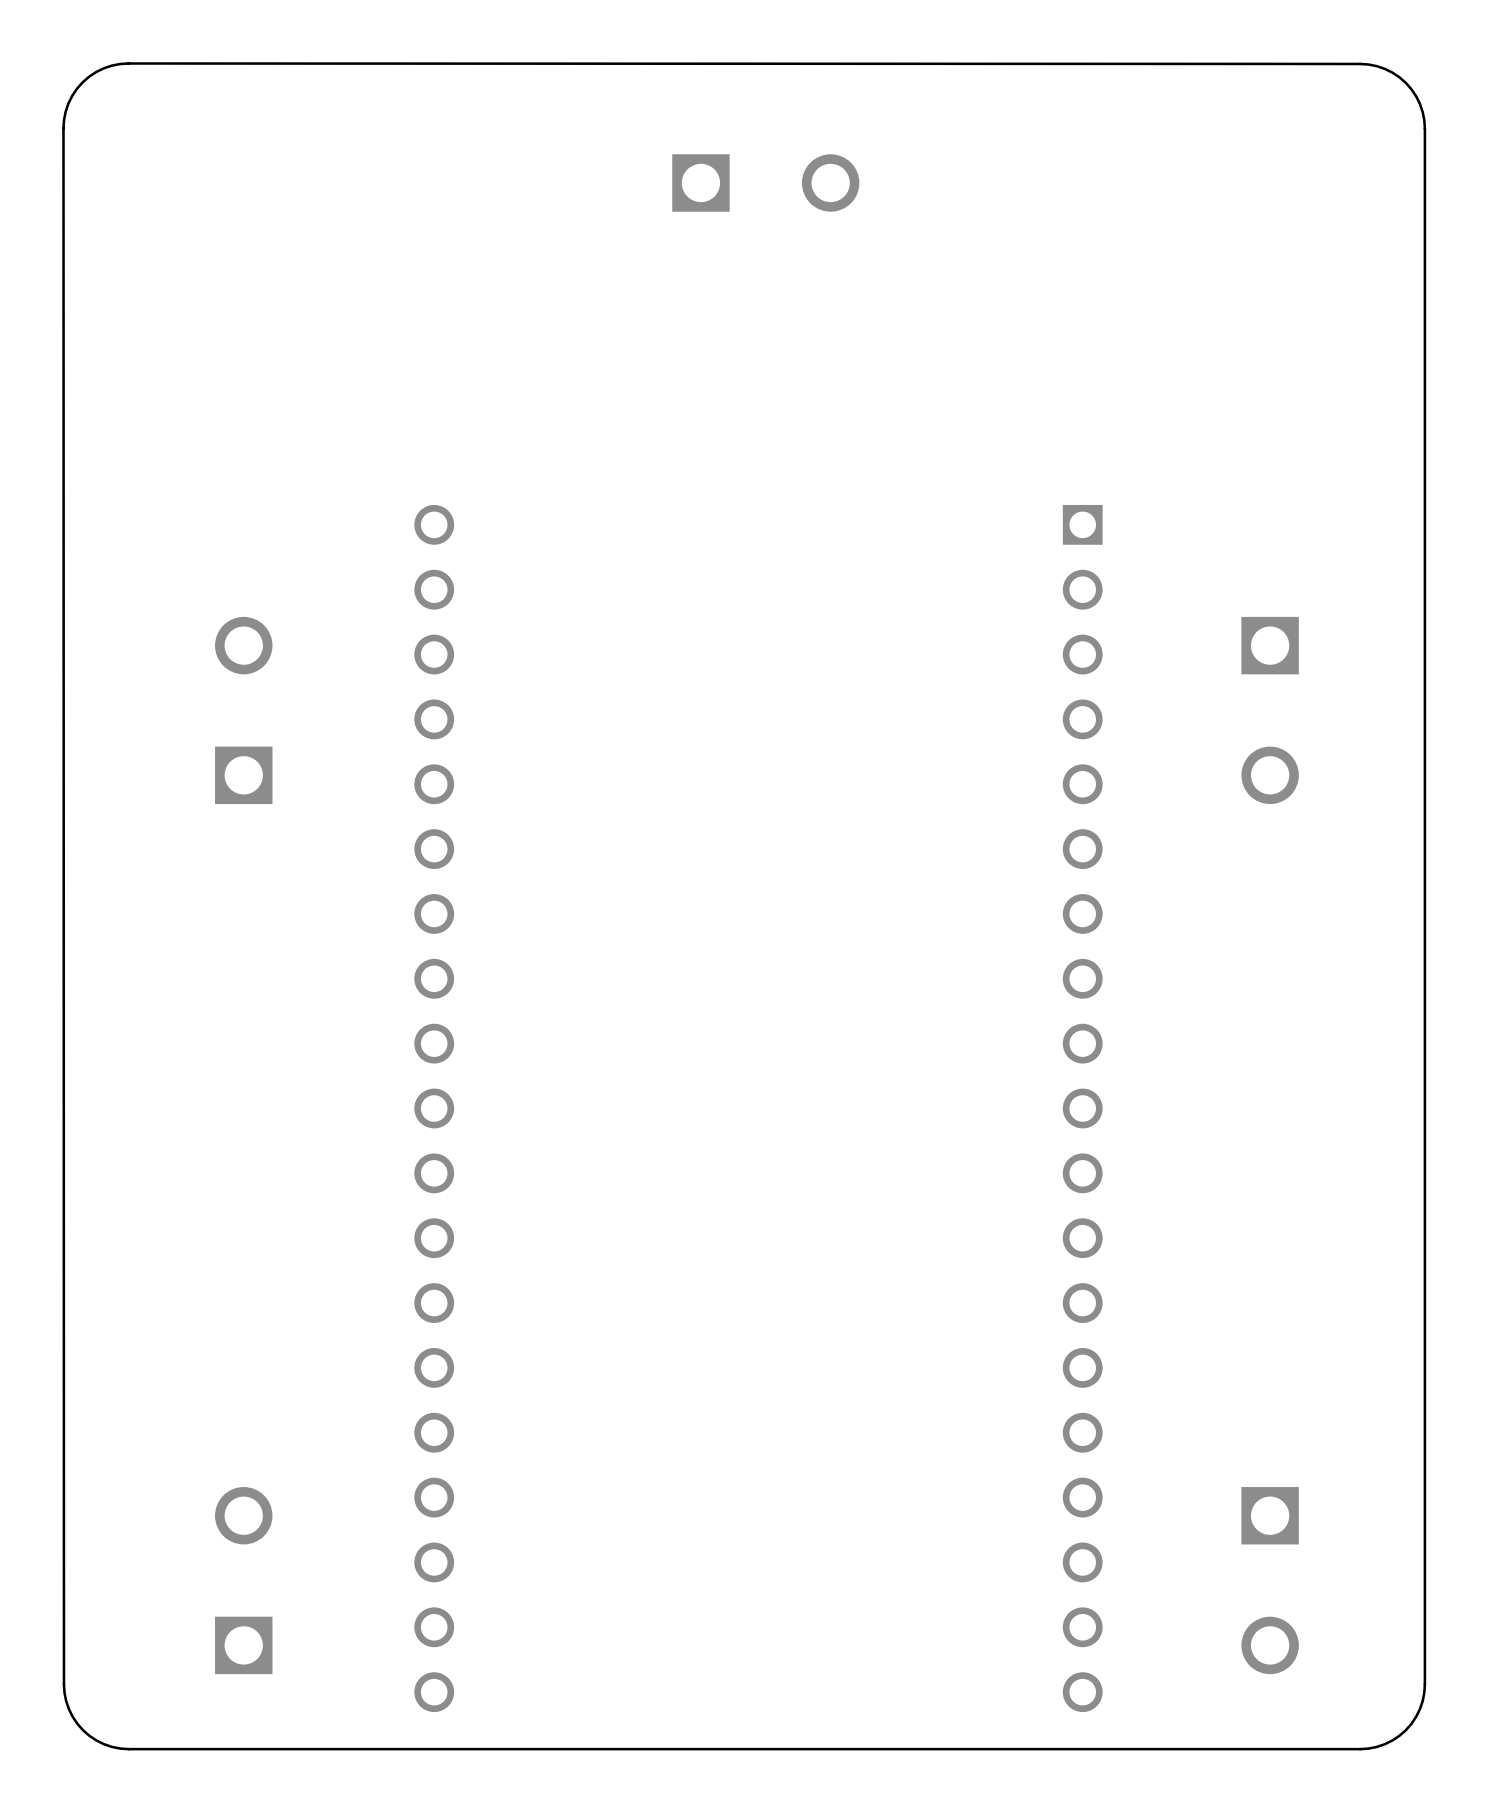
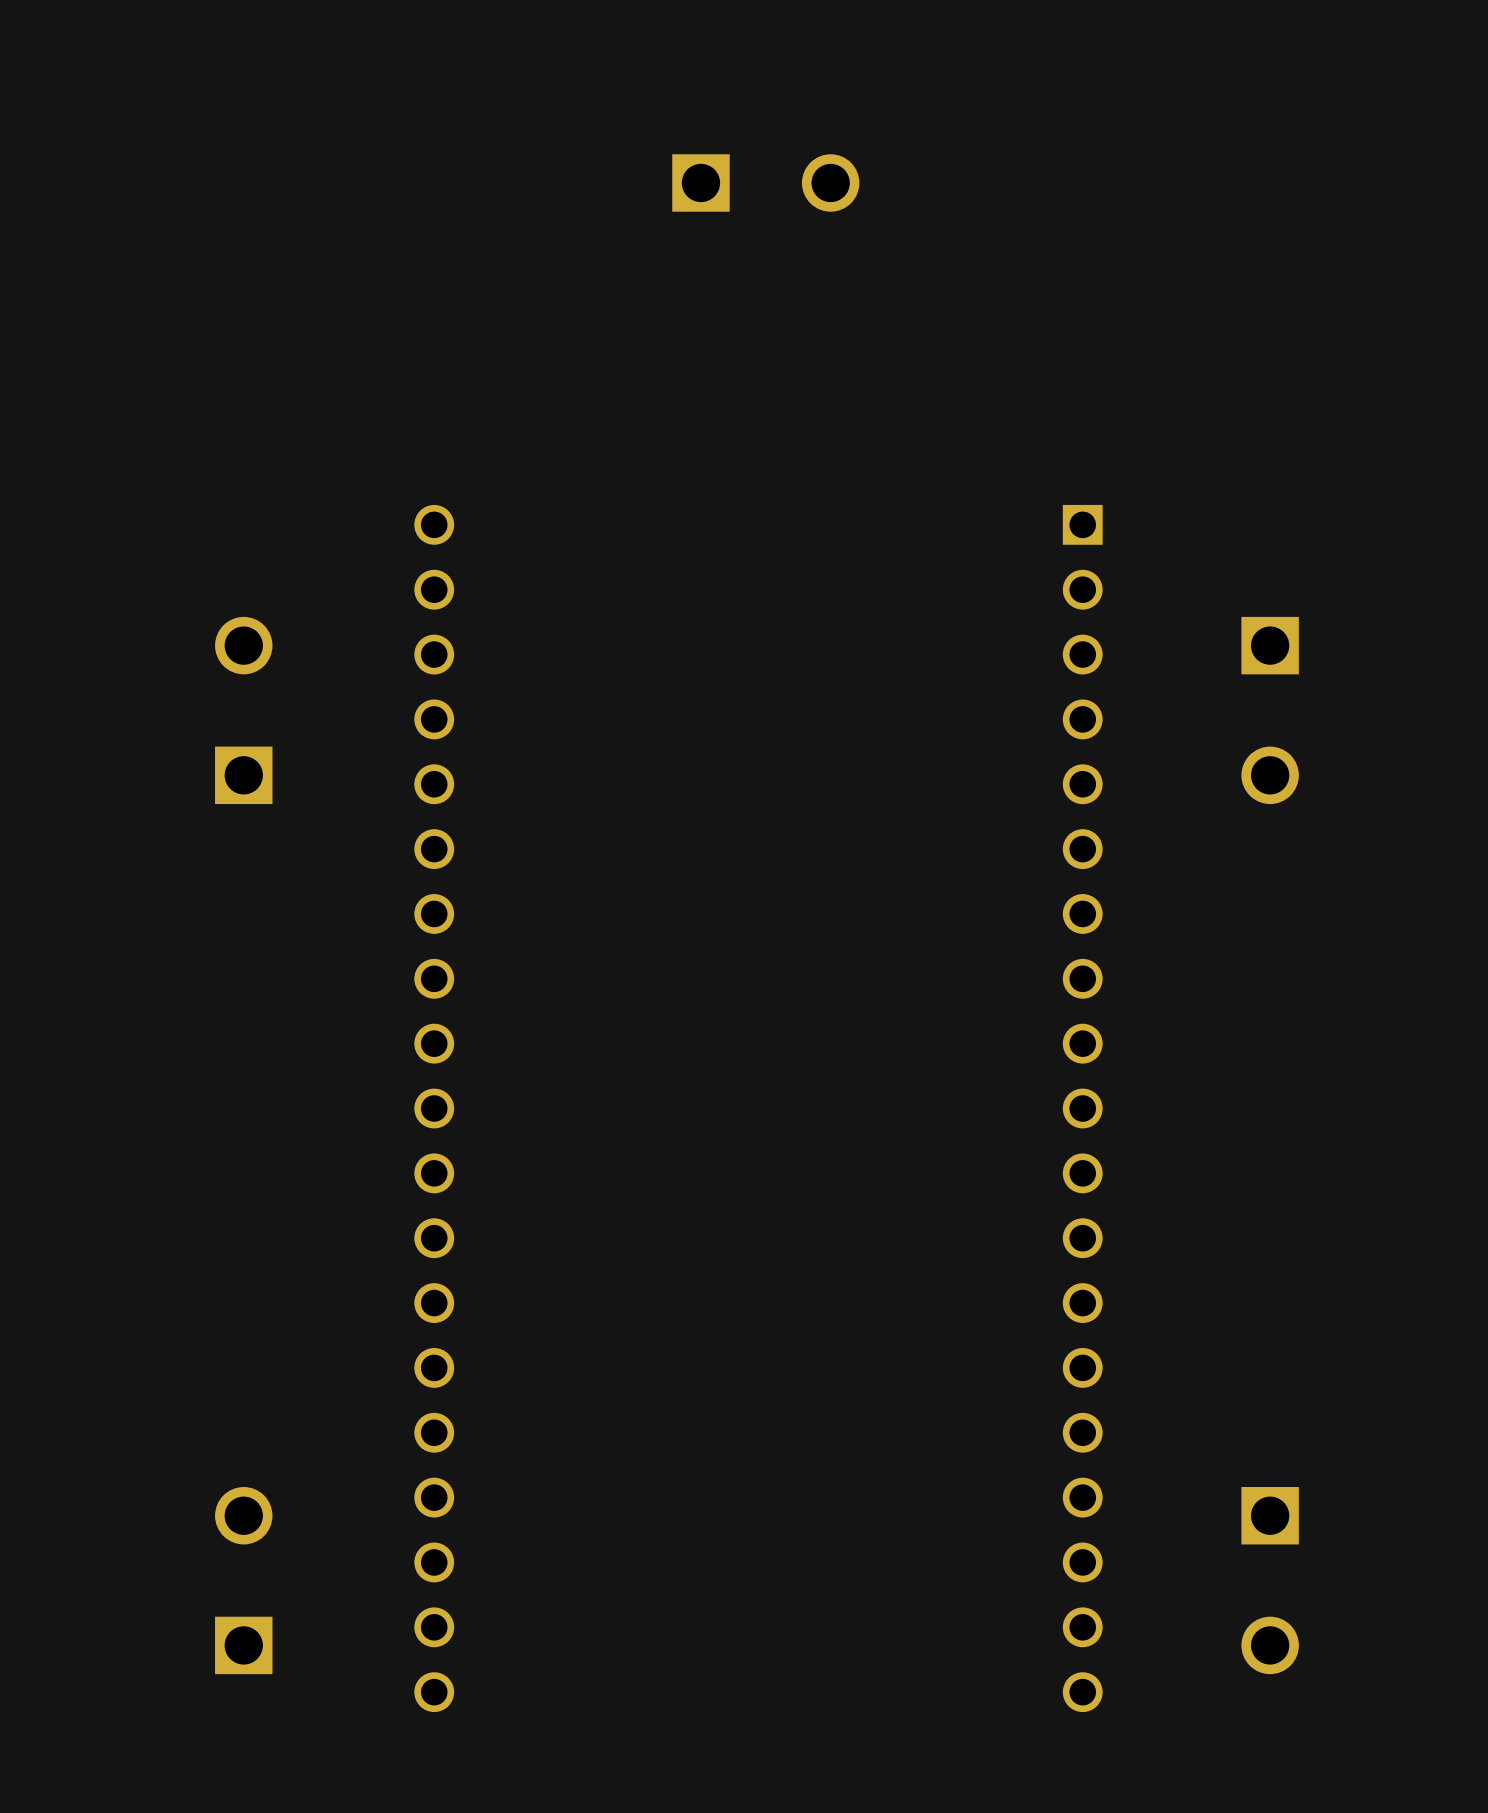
board edge: (128, 63) (1360, 63) (1384, 68) (1399, 77) (1411, 89) (1419, 103) (1424, 128) (1424, 1684) (1419, 1709) (1411, 1723) (1399, 1735) (1384, 1744) (1360, 1749) (128, 1749) (103, 1744) (89, 1735) (77, 1723) (68, 1709) (63, 1684) (63, 128) (68, 103) (82, 82) (103, 68) (128, 63) -> none

